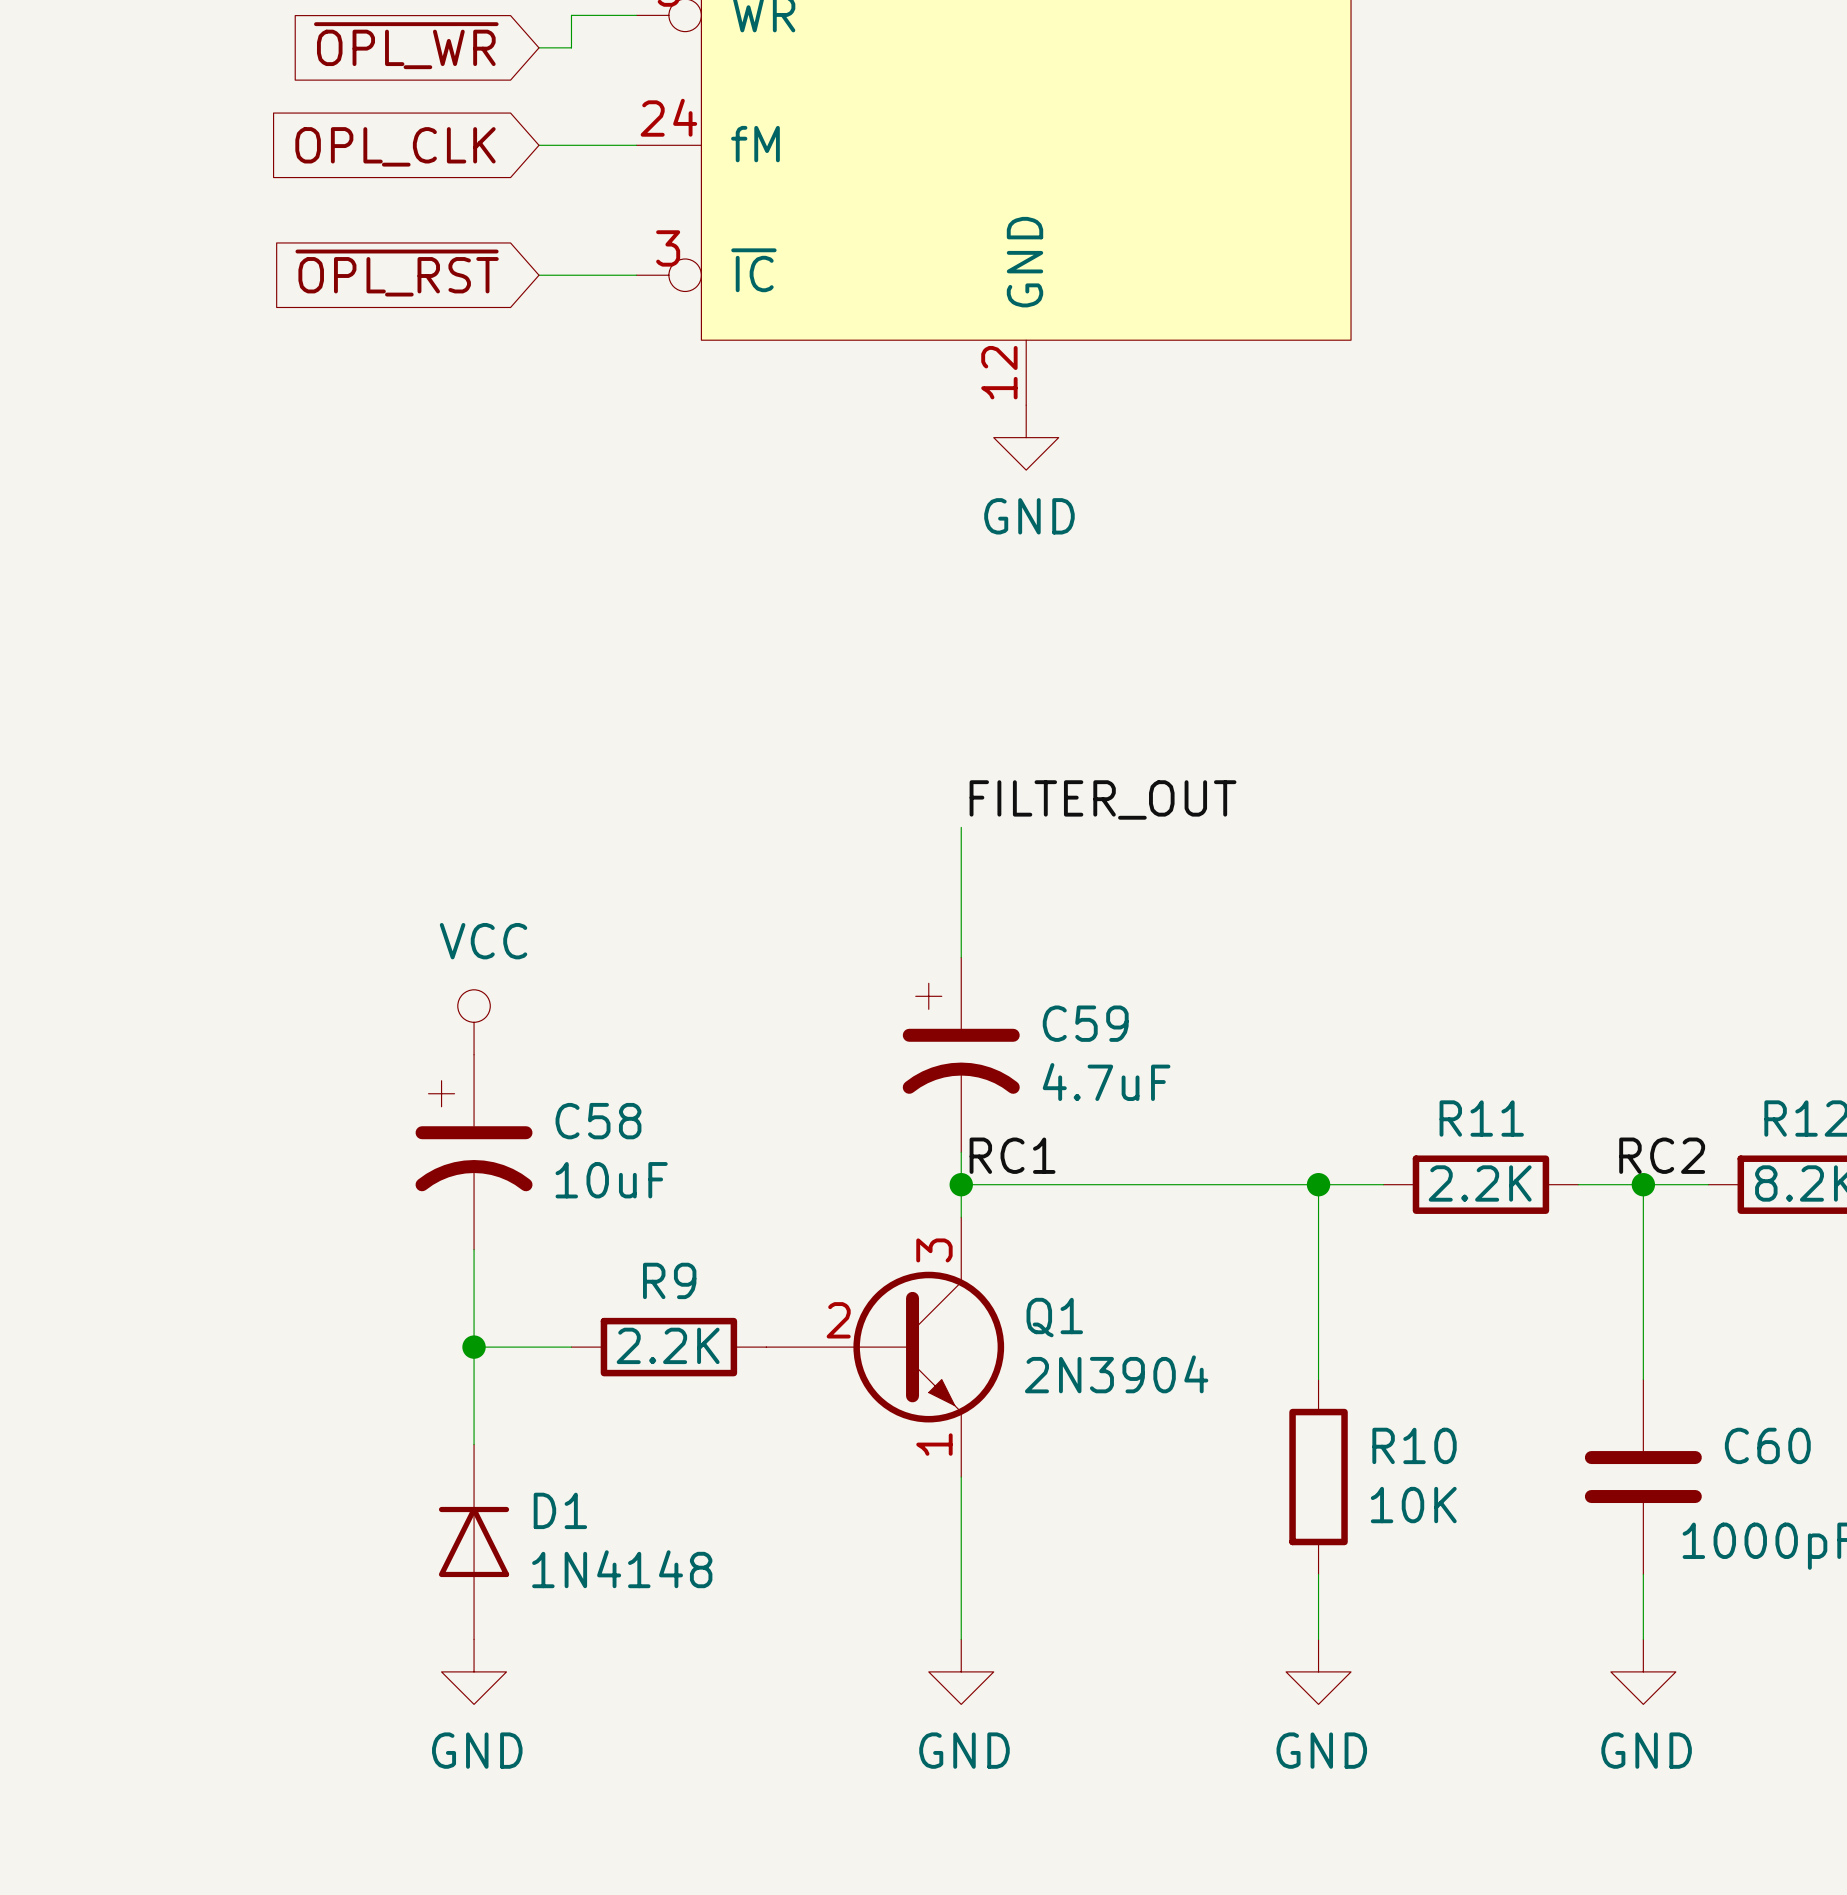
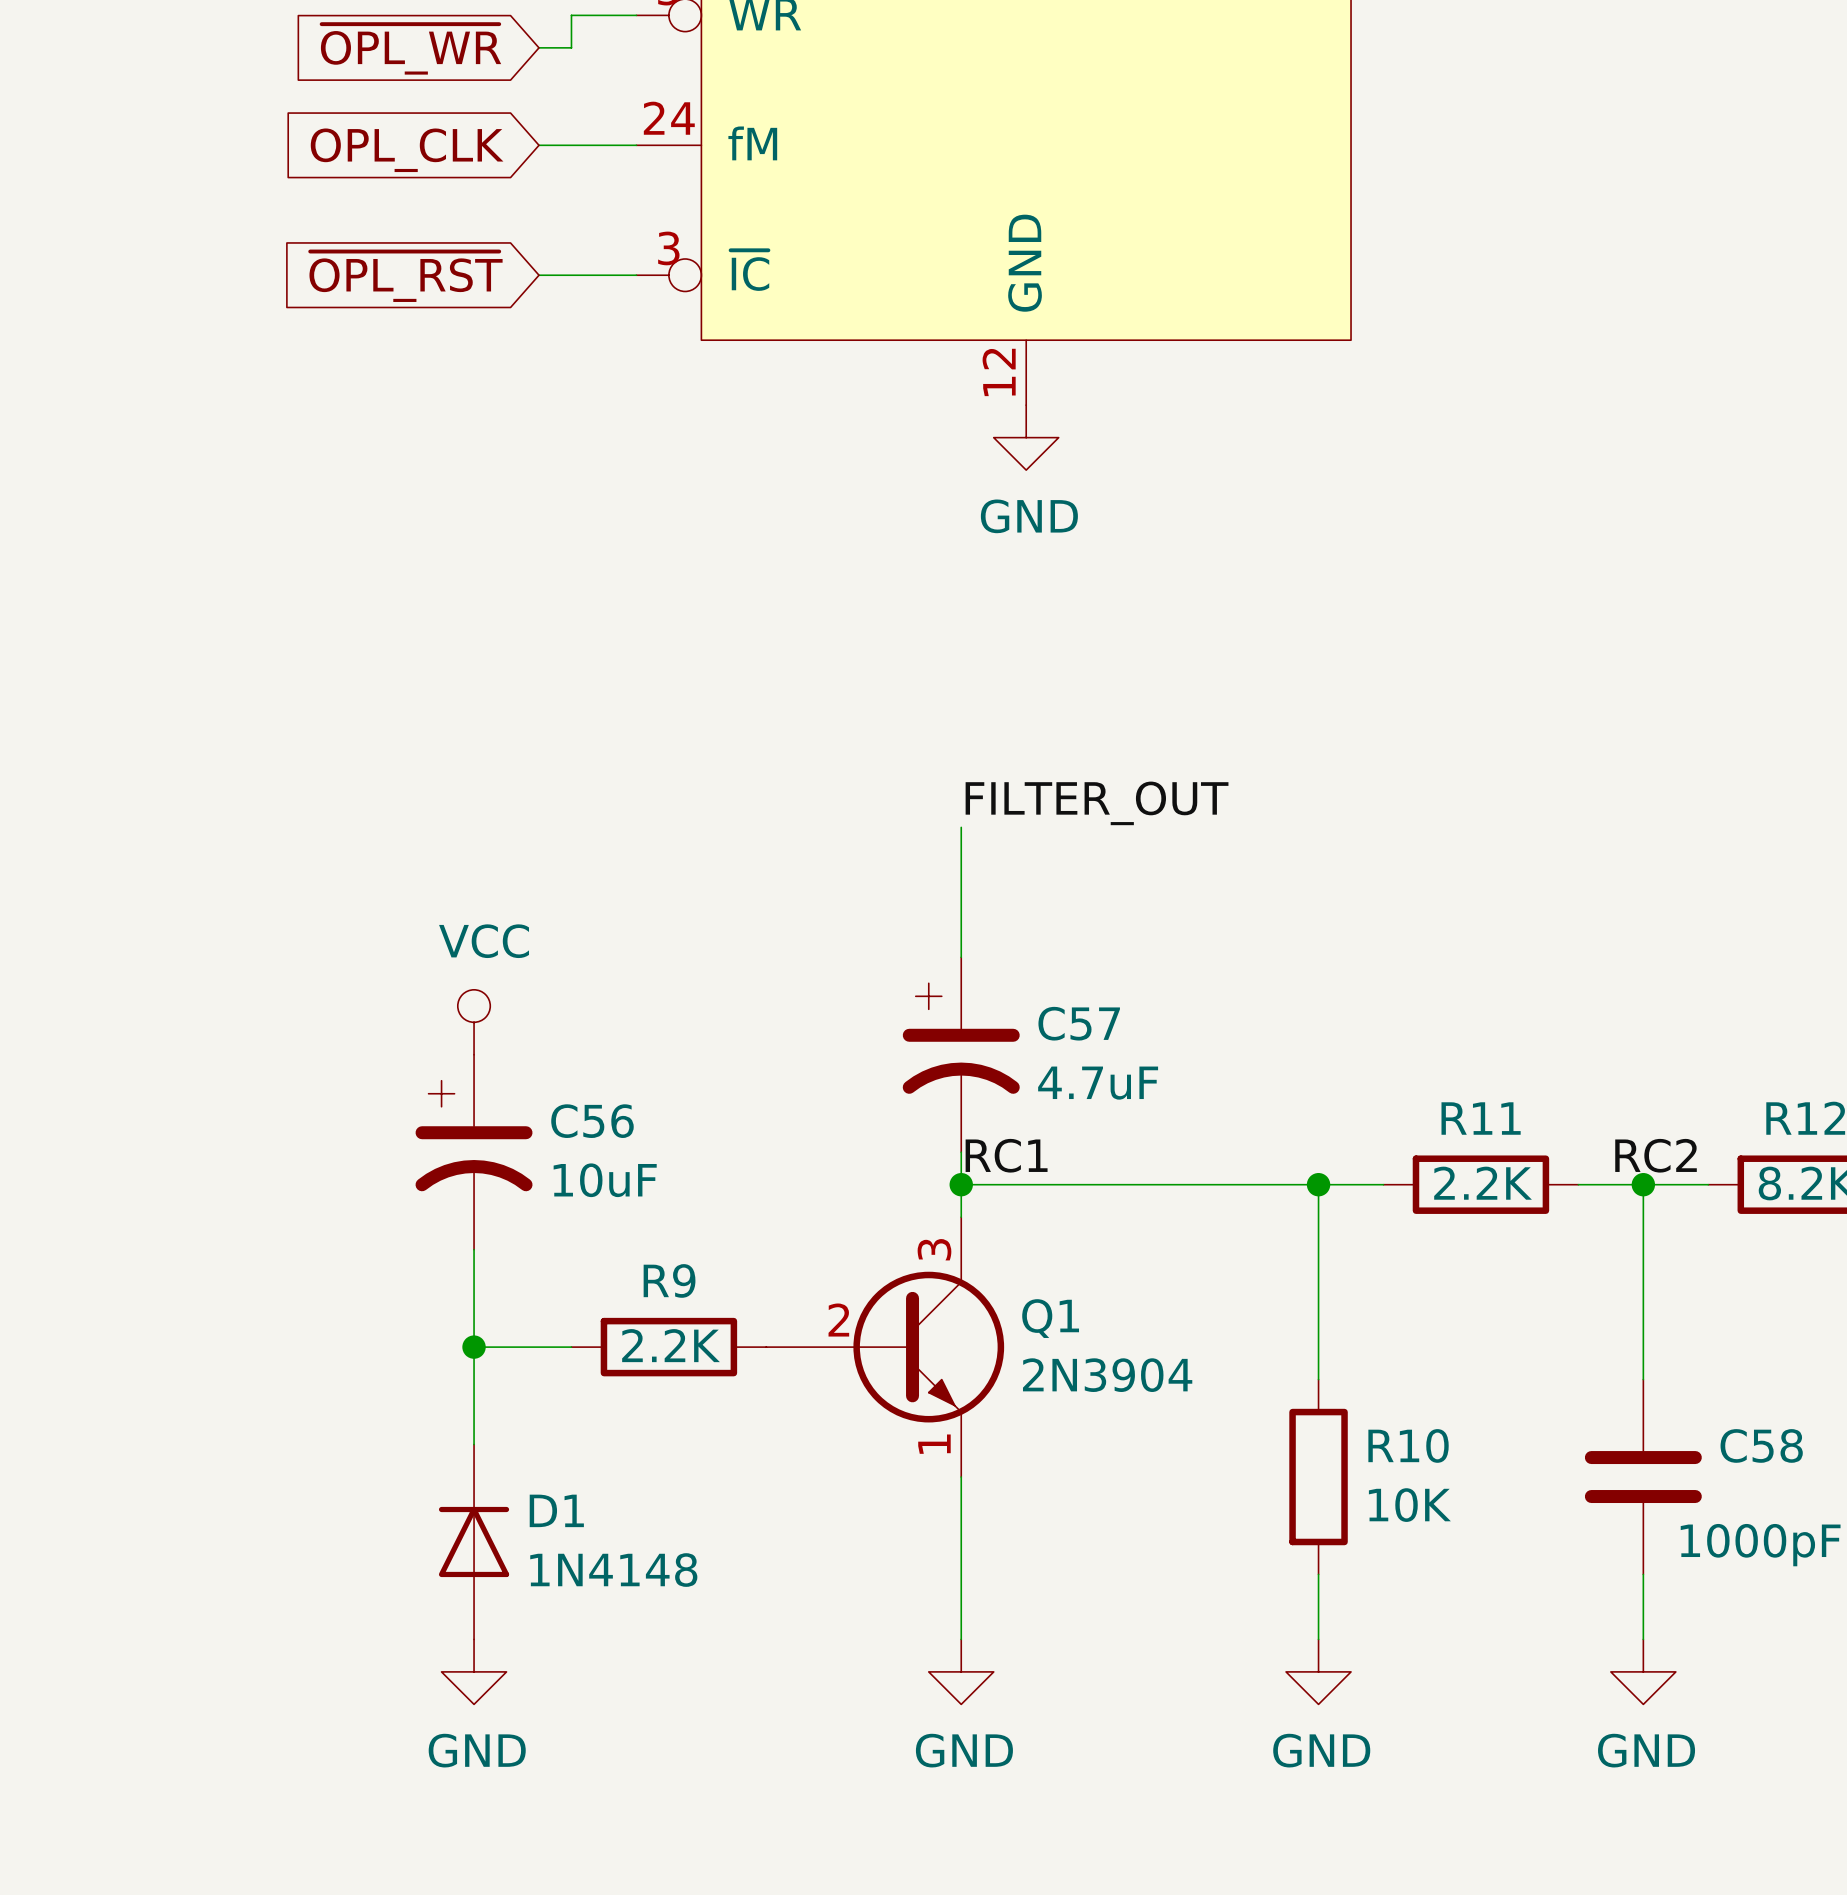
C59 name: C59 (1085, 1023) -> C57 (1079, 1023)
C58 name: C58 (598, 1121) -> C56 (592, 1121)
C60 name: C60 (1767, 1445) -> C58 (1761, 1445)

